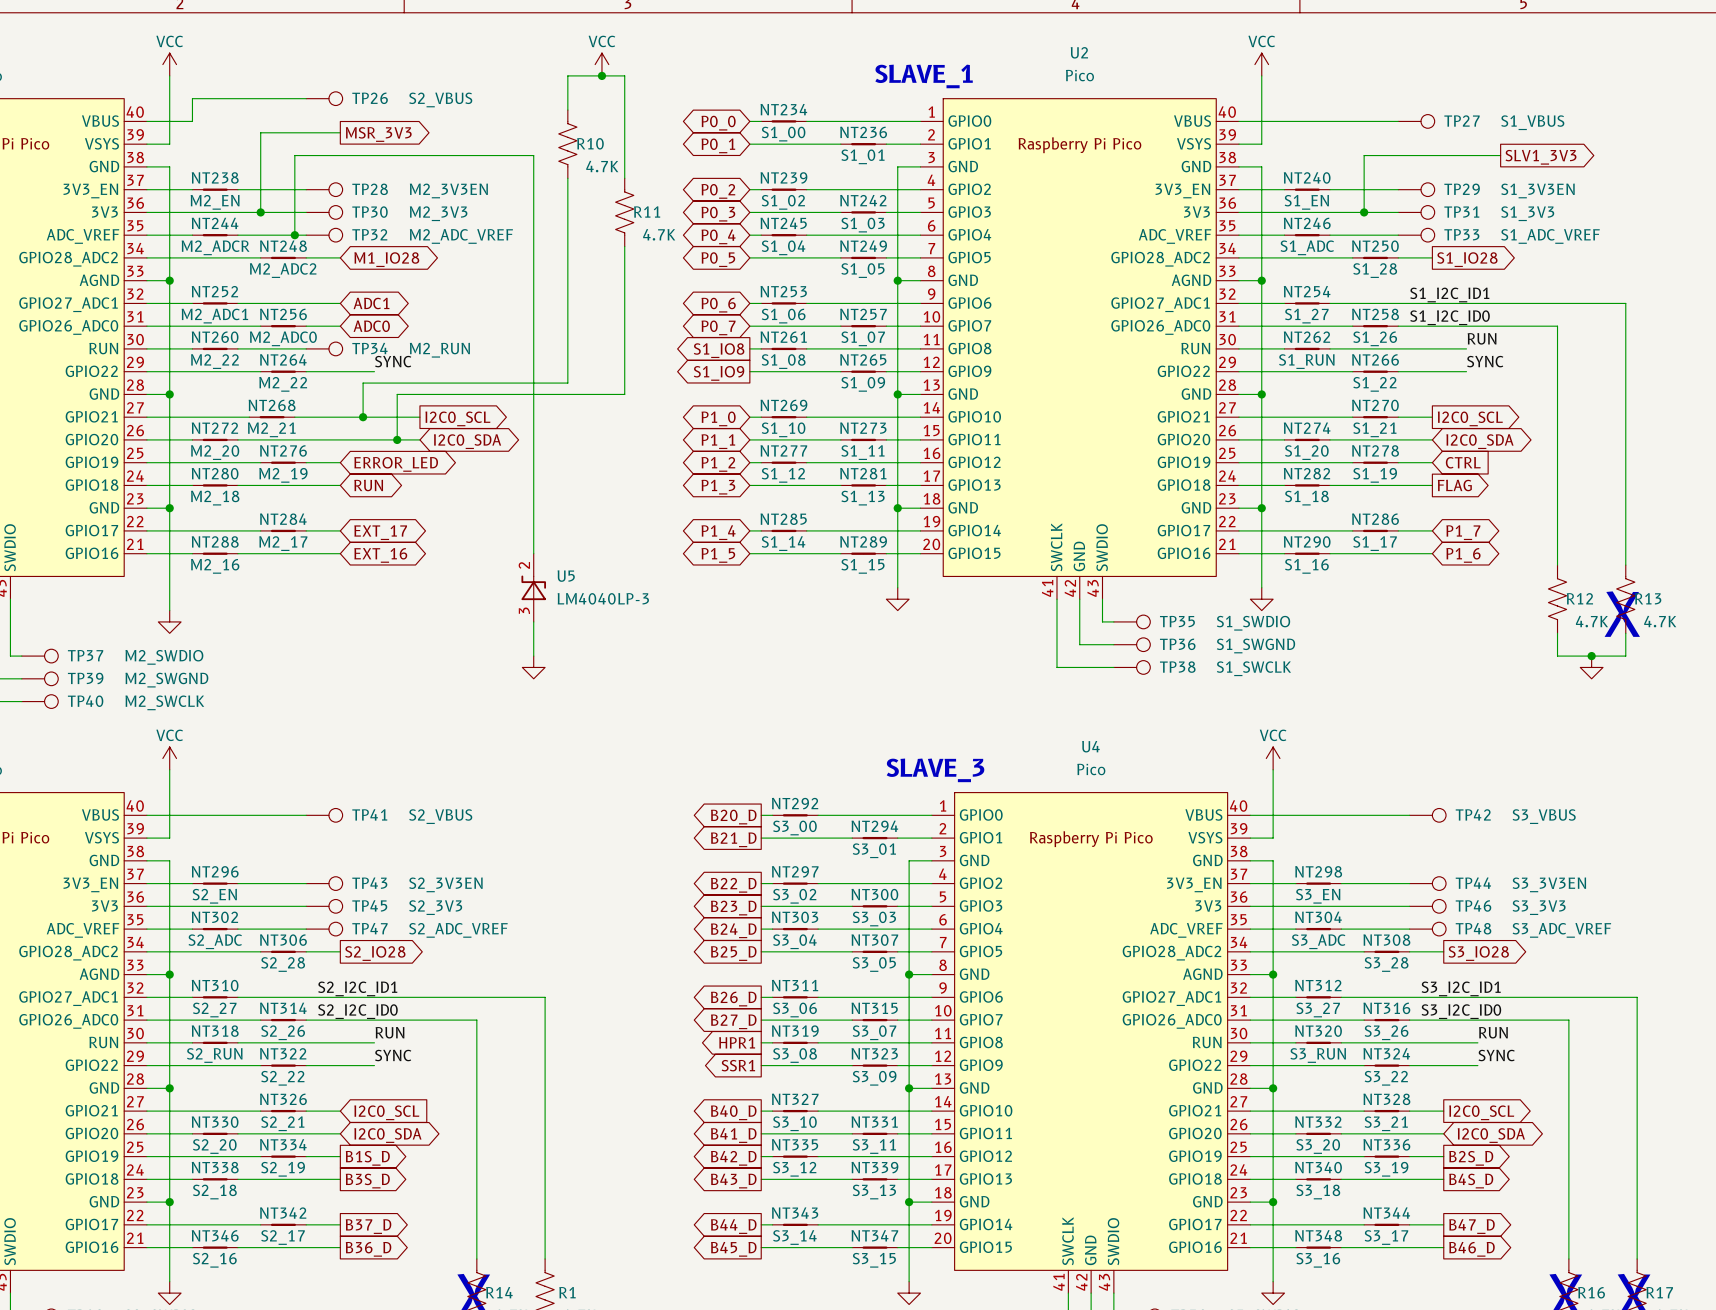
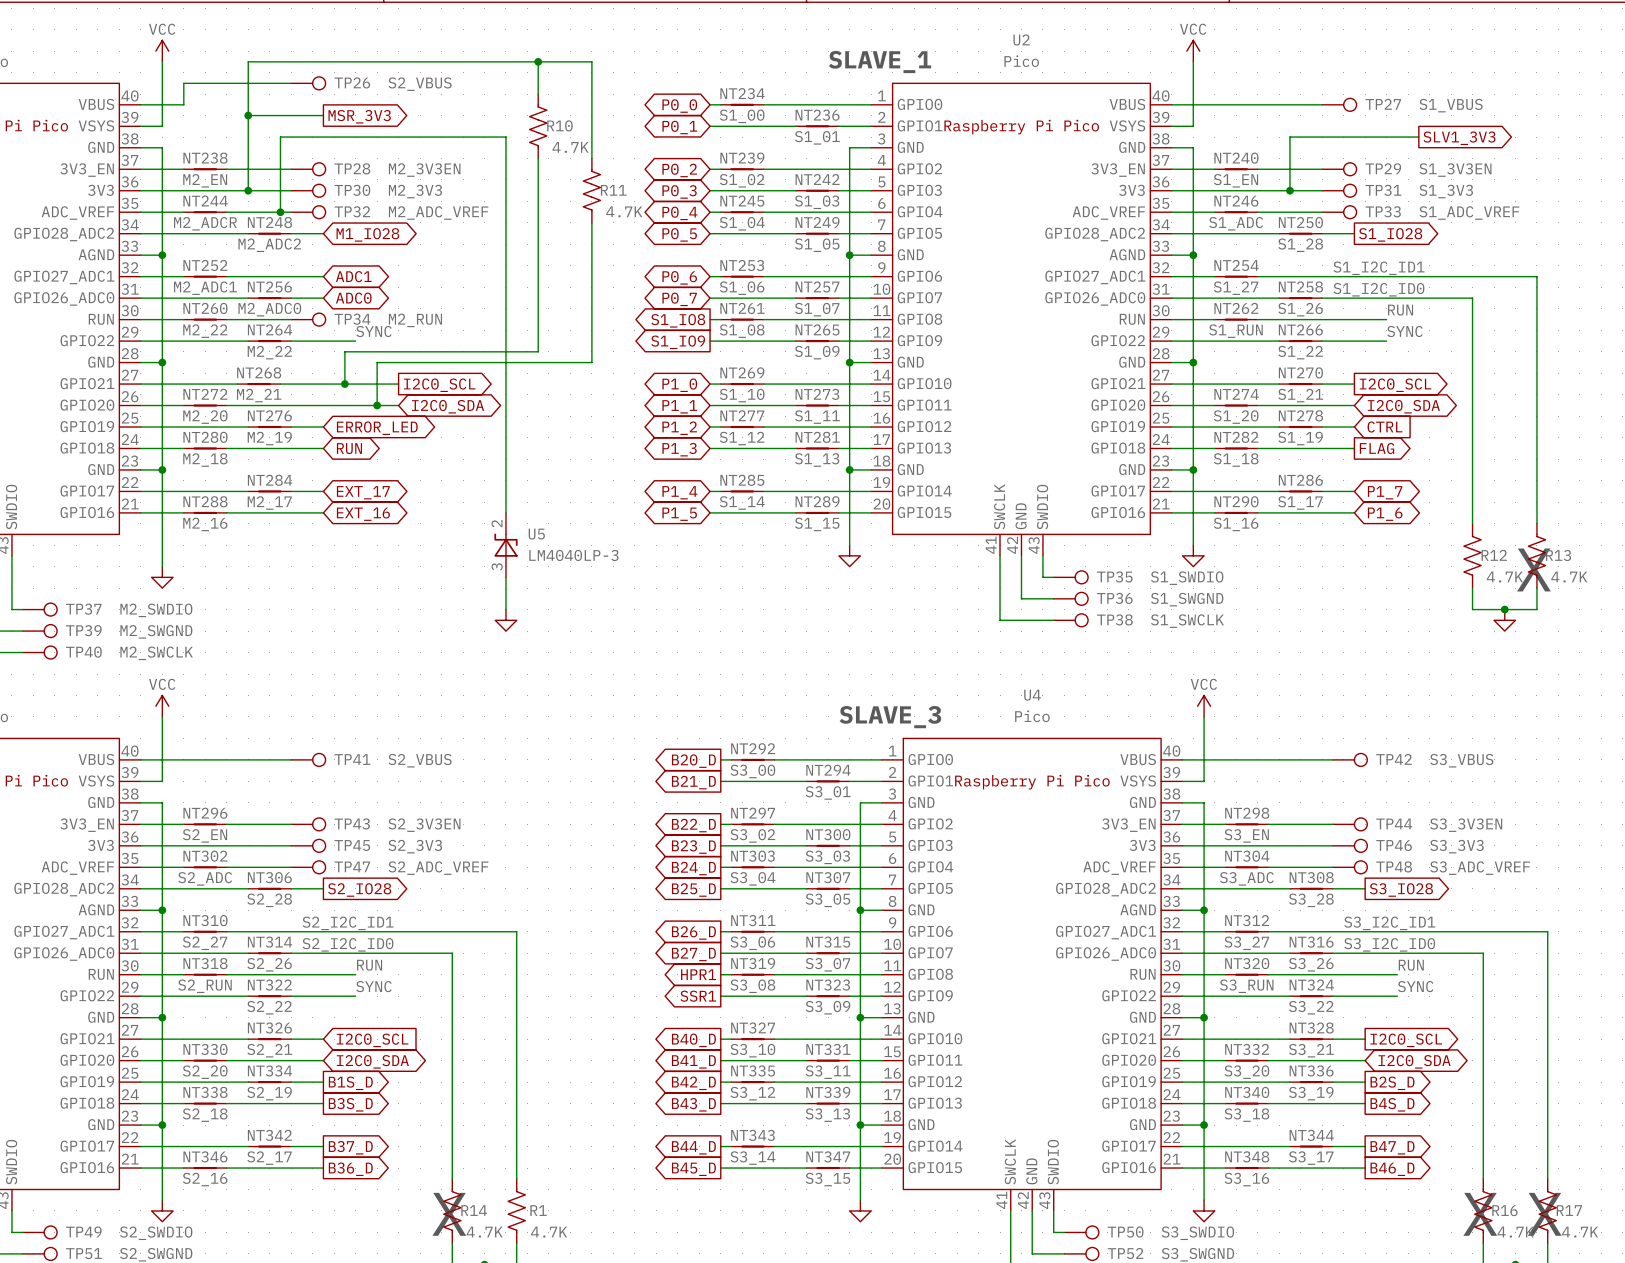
power symbol: VCC (601, 64) -> none
wire: none -> (538, 61) (248, 61) (248, 115)
junction position: (601, 75) -> (538, 61)
junction: none -> (248, 115)

